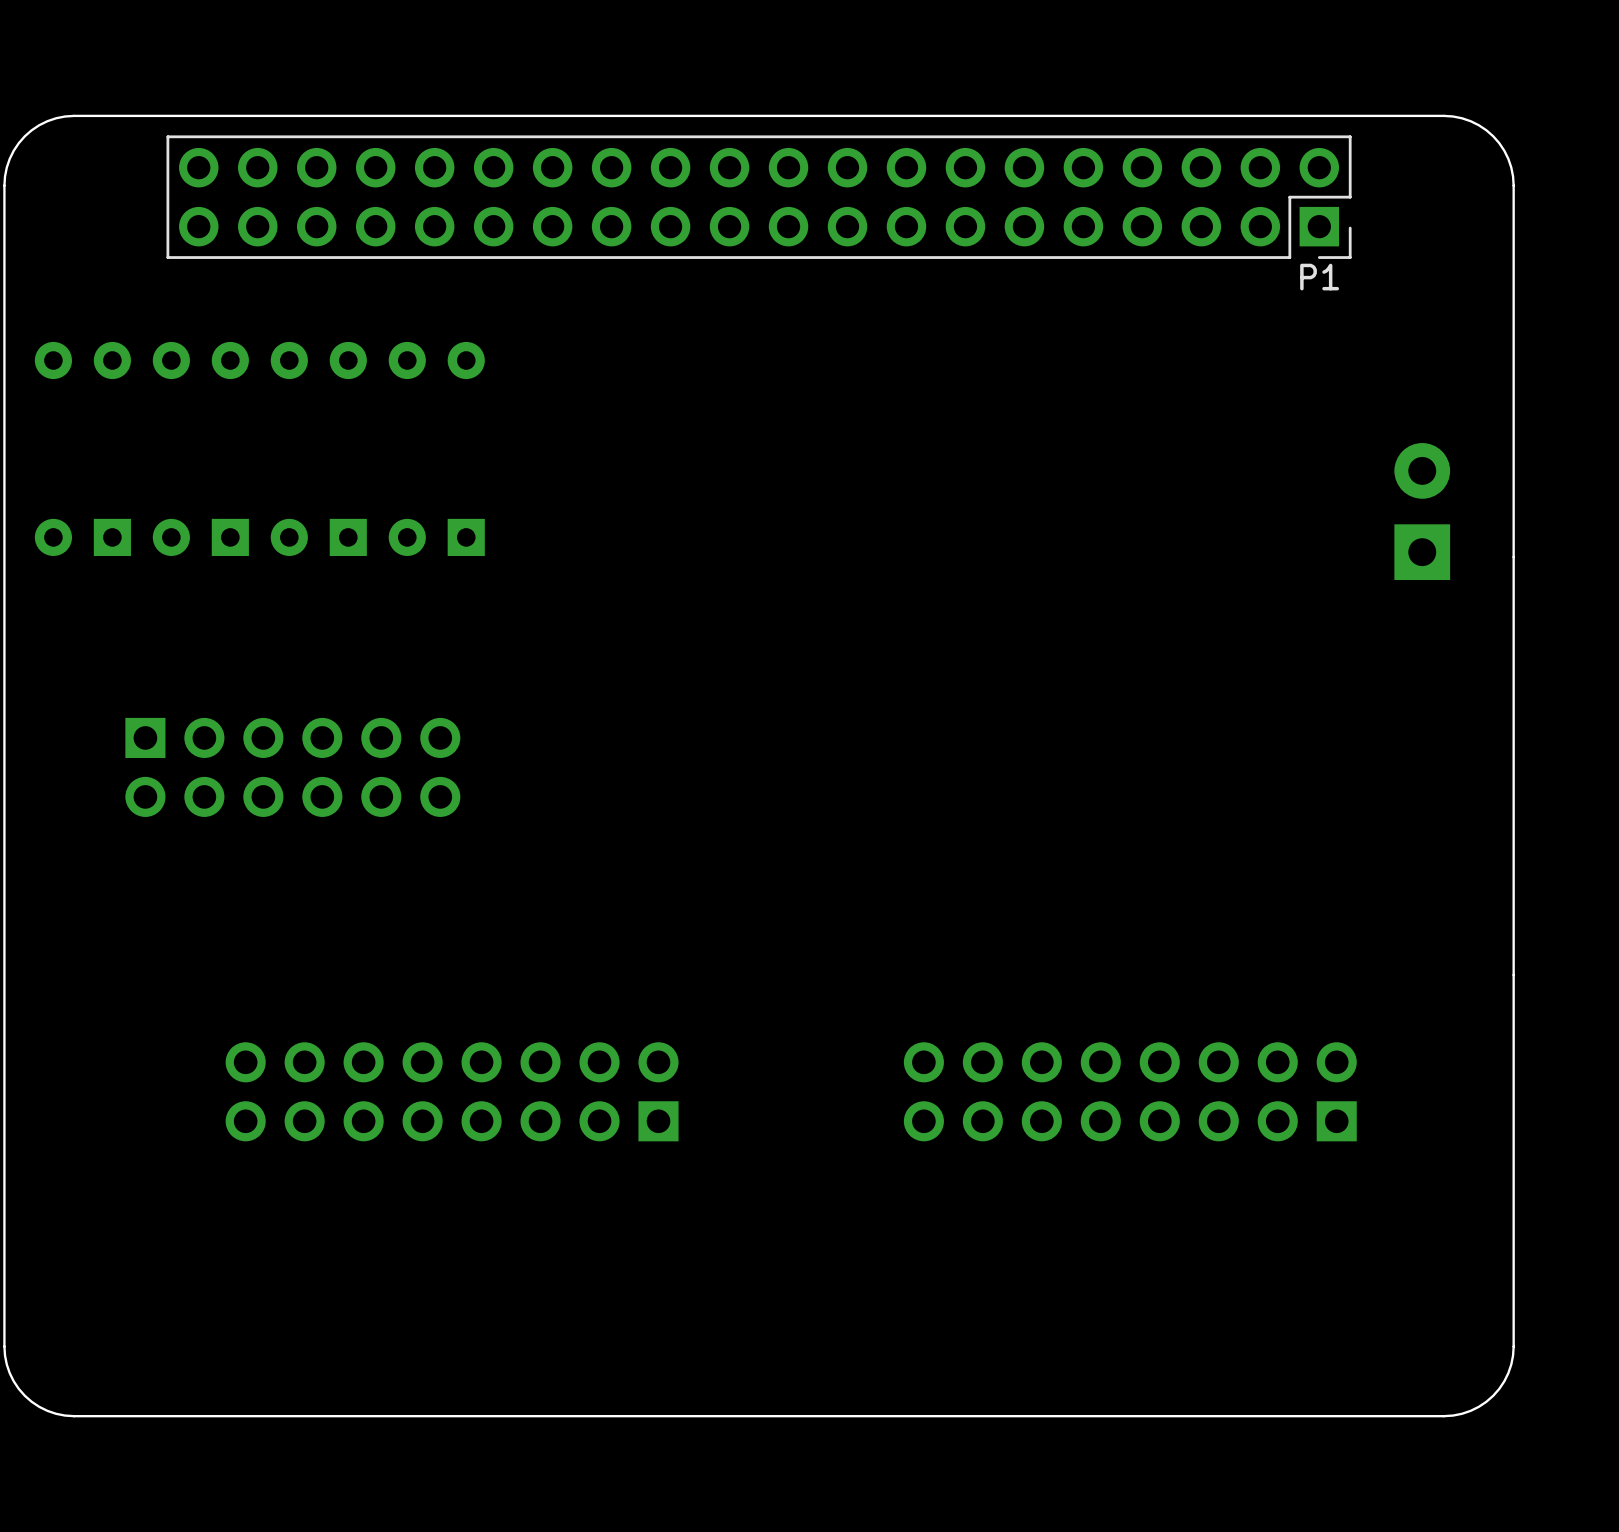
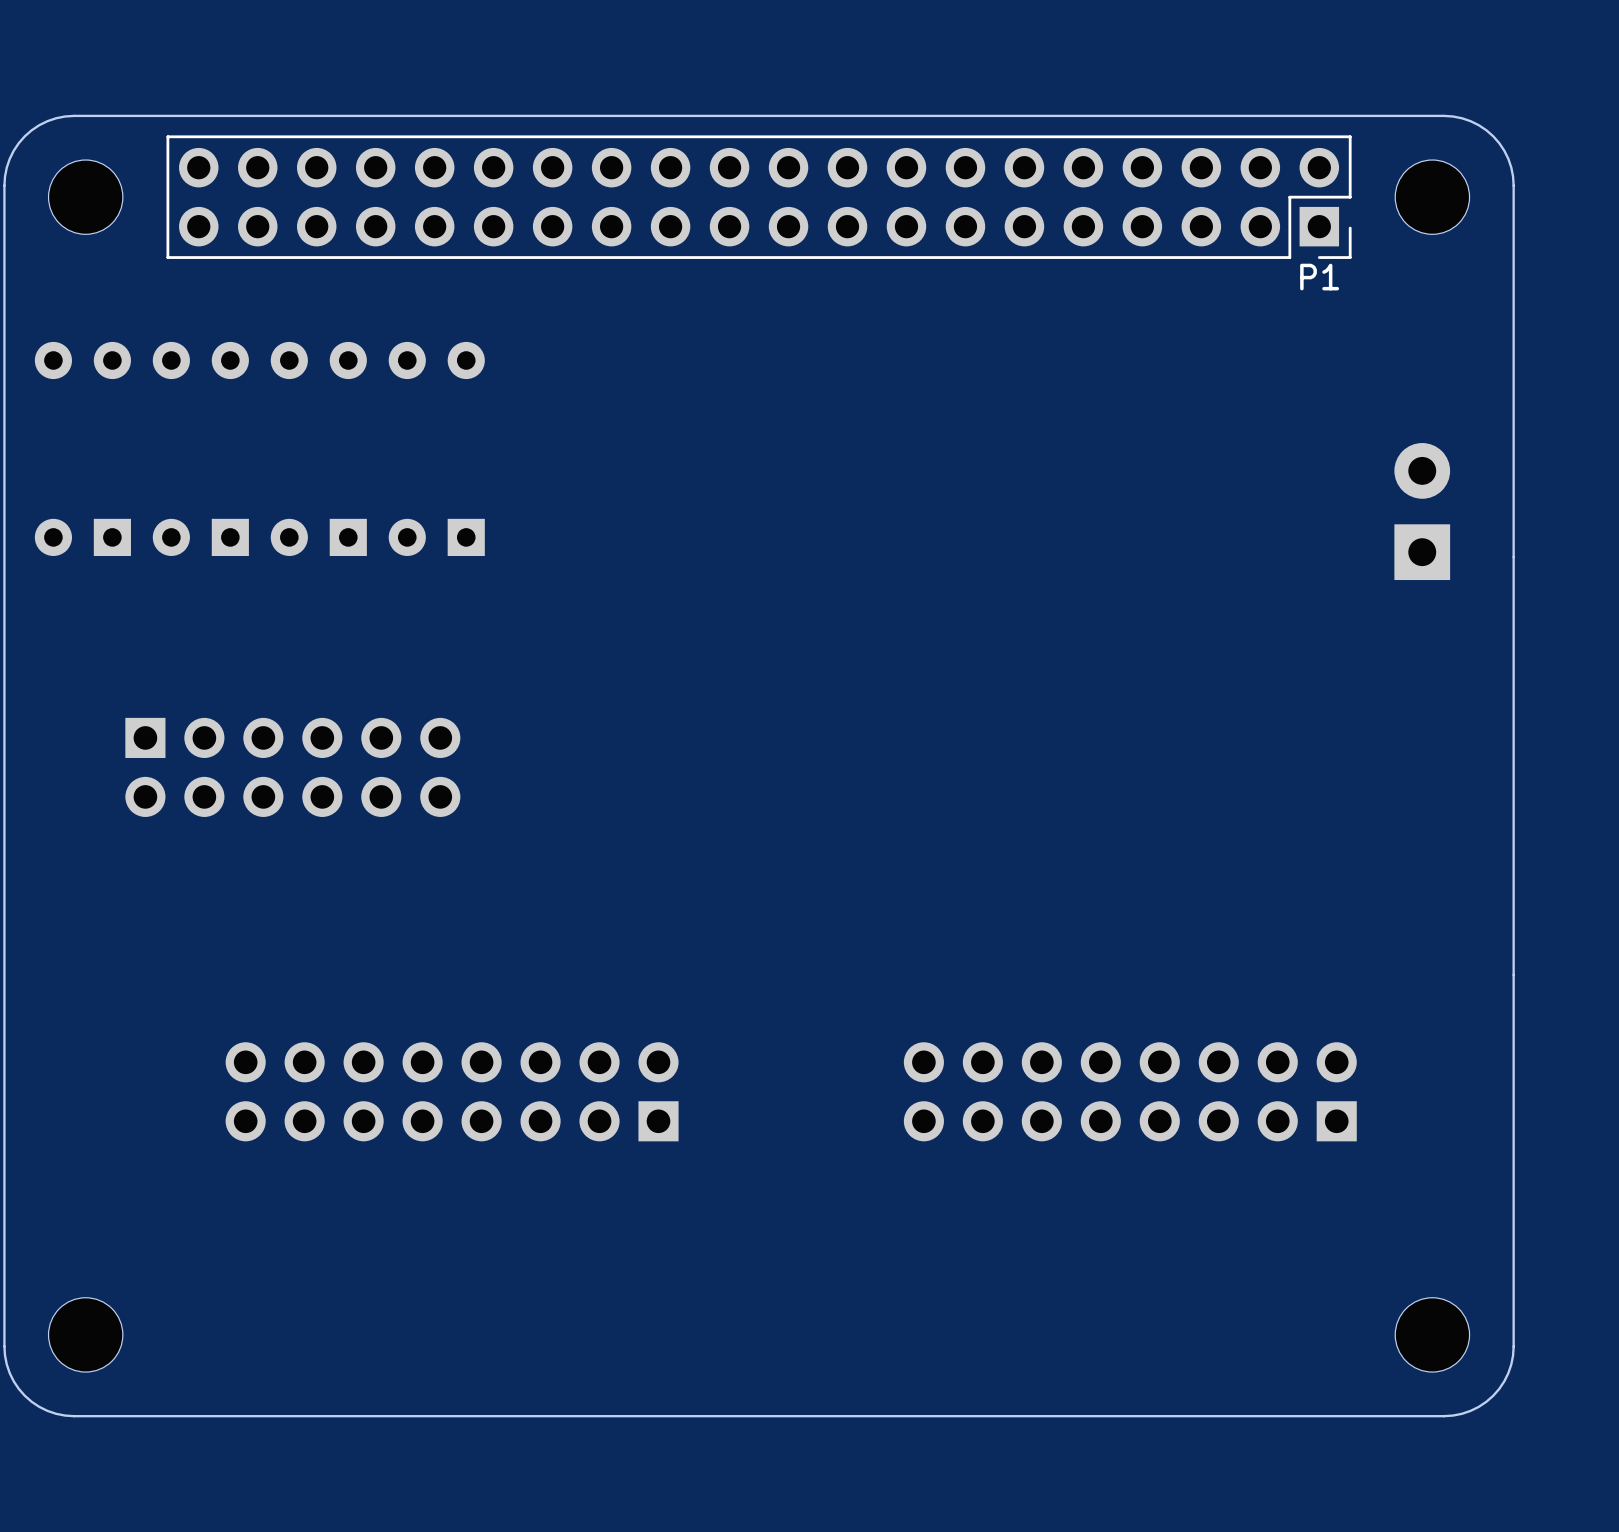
part: none -> (85, 197)
part: none -> (1432, 197)
part: none -> (85, 1334)
part: none -> (1432, 1334)

